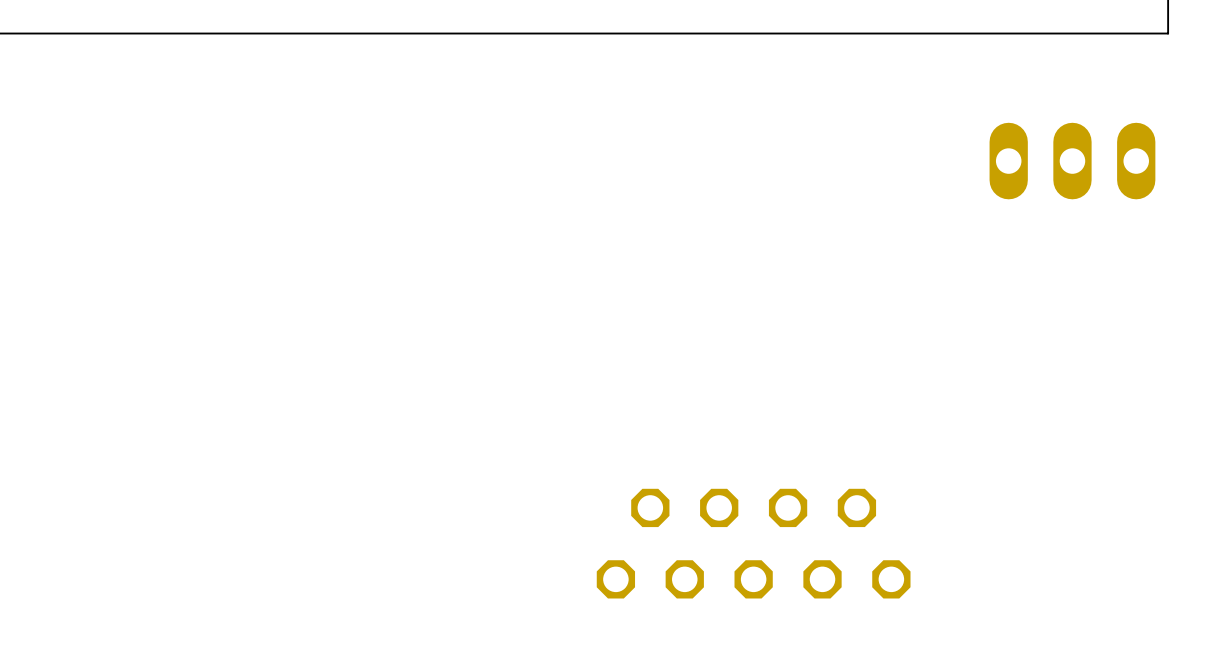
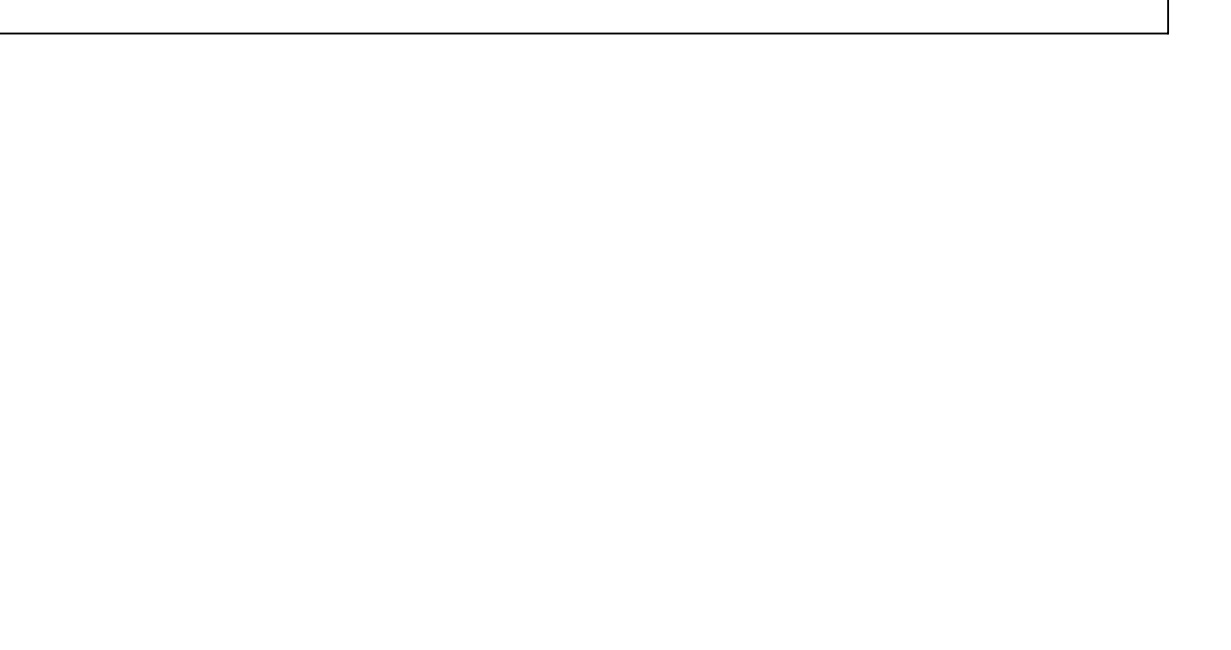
part: (1072, 161) -> none
part: (753, 543) -> none

